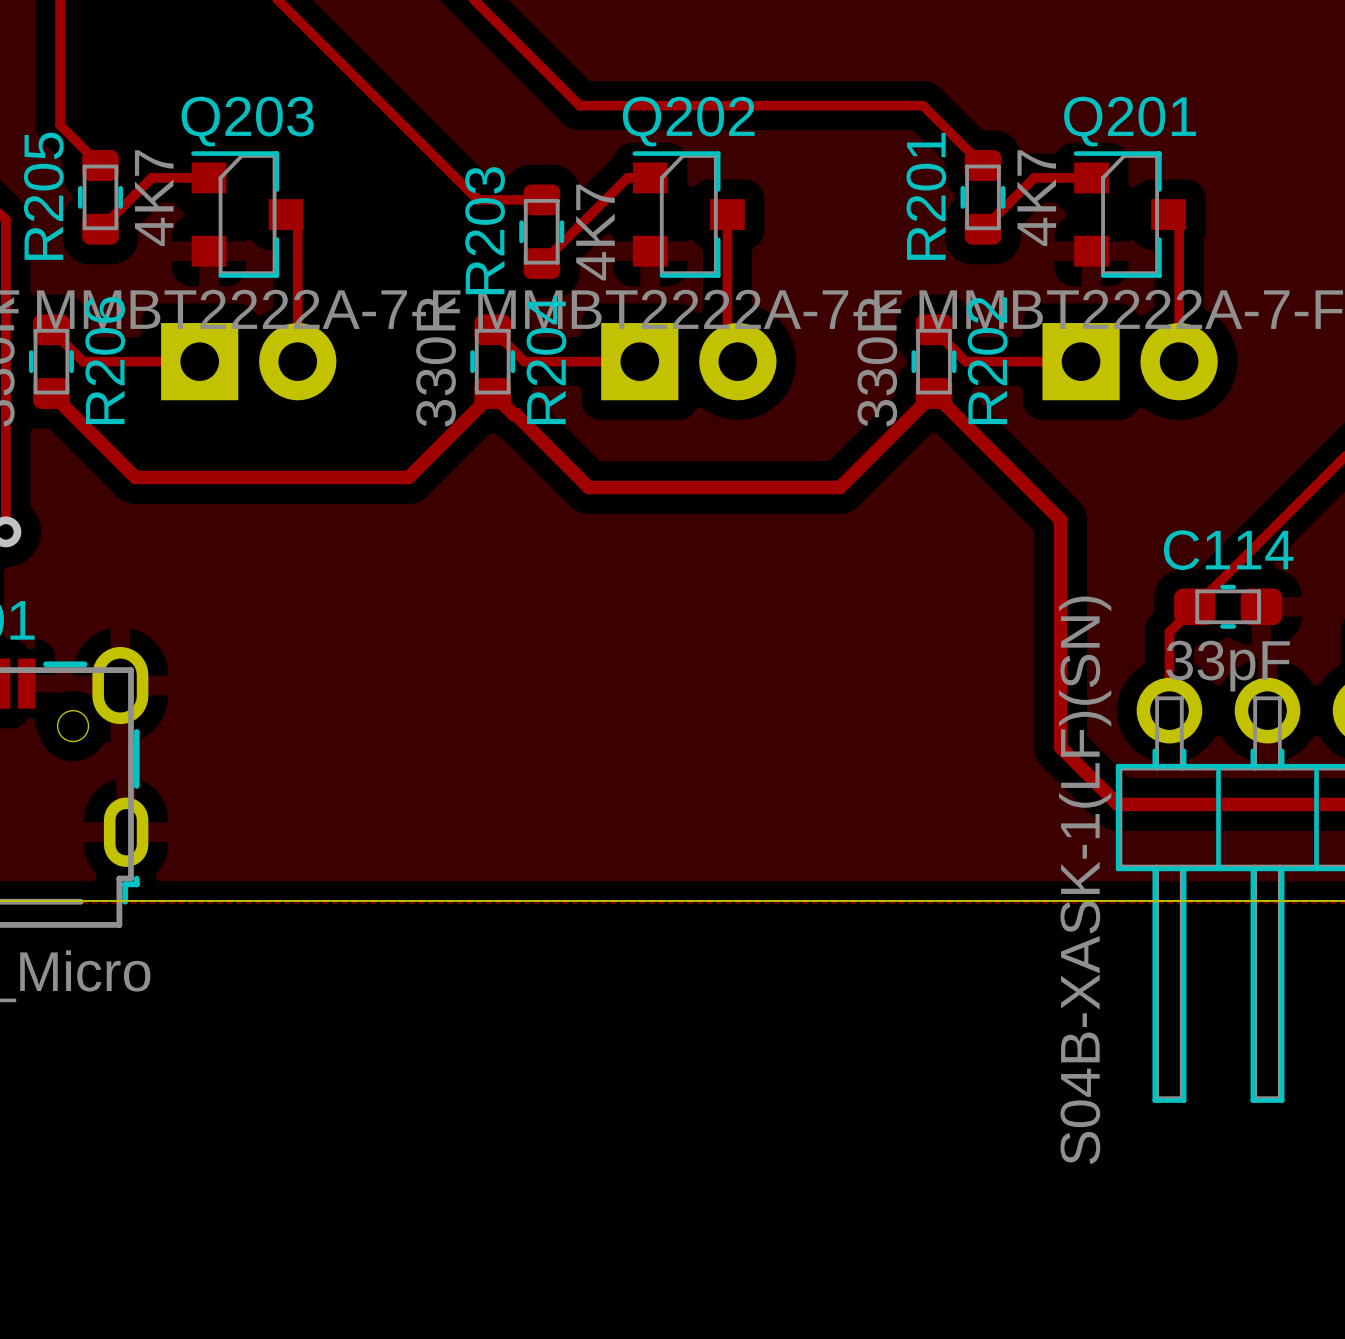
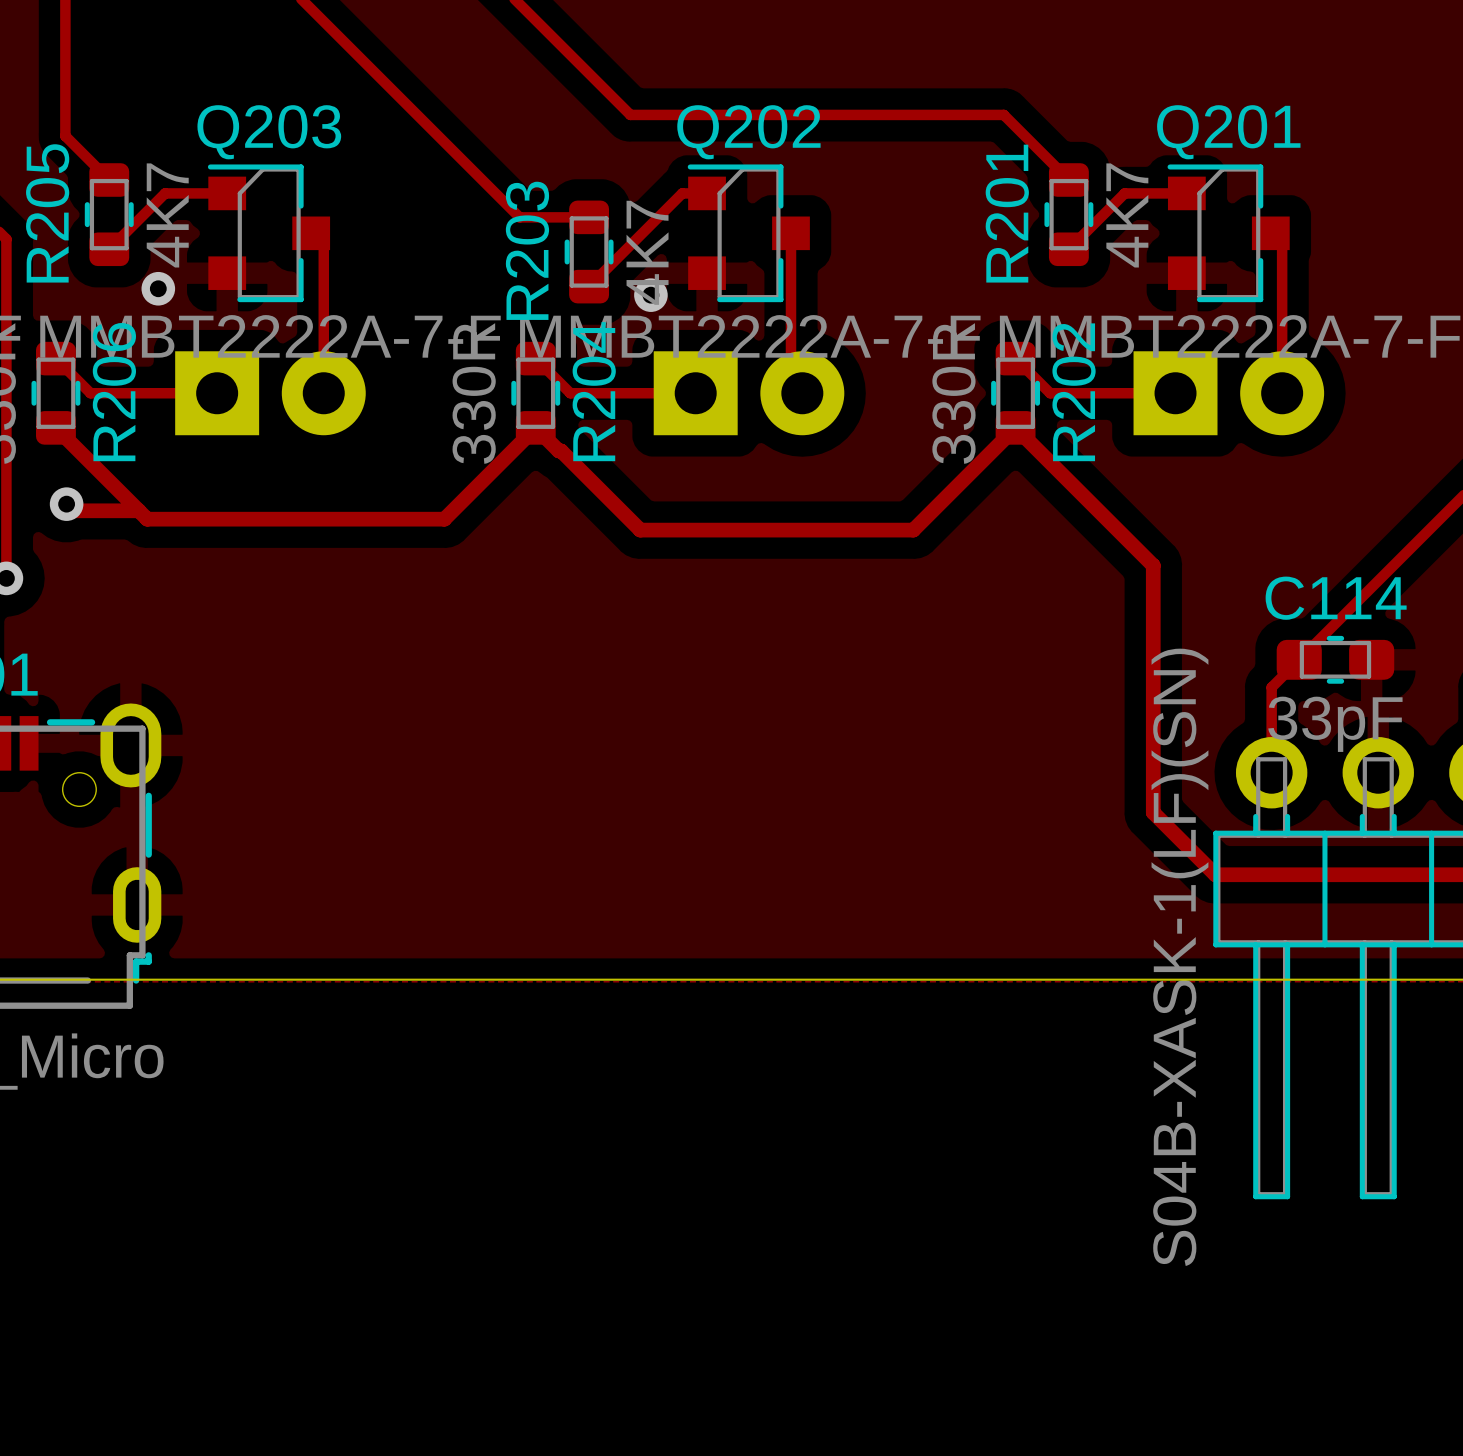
via: none -> (158, 288)
via: none -> (650, 295)
track: none -> (66, 504) (73, 510) (138, 510)
via: none -> (66, 504)

